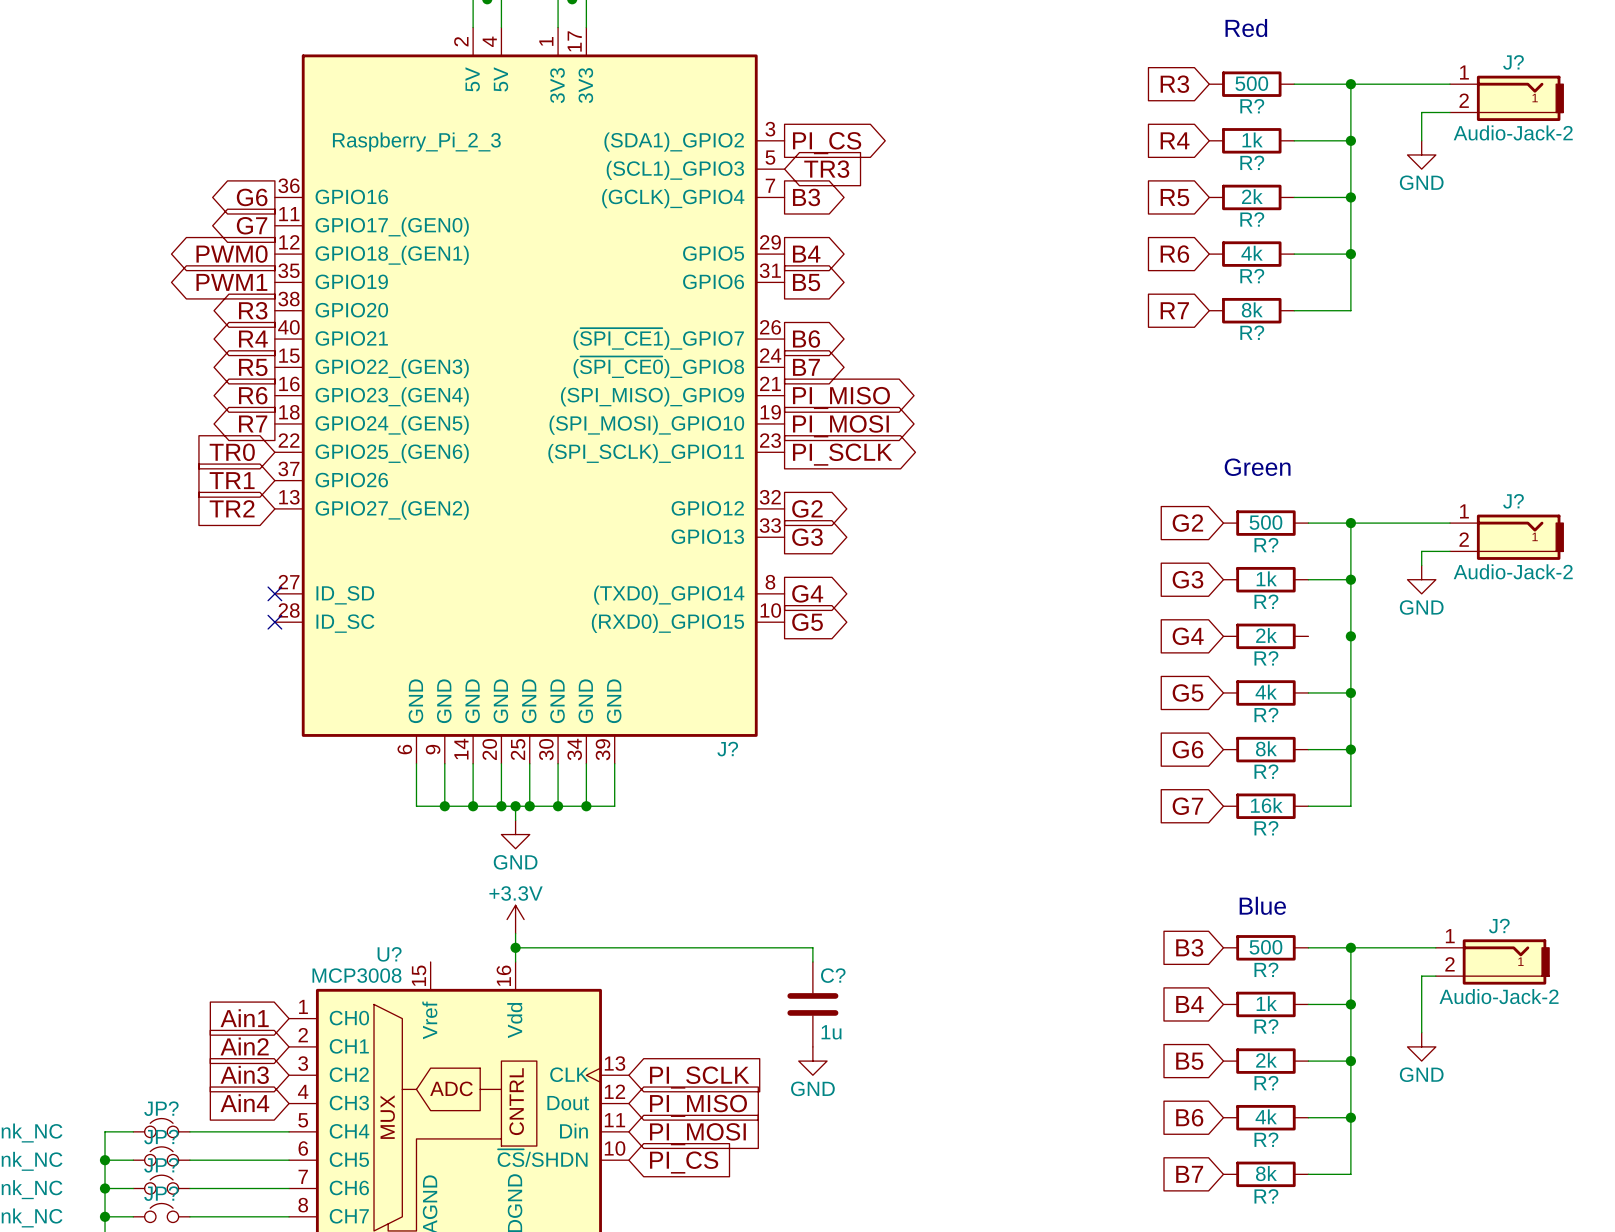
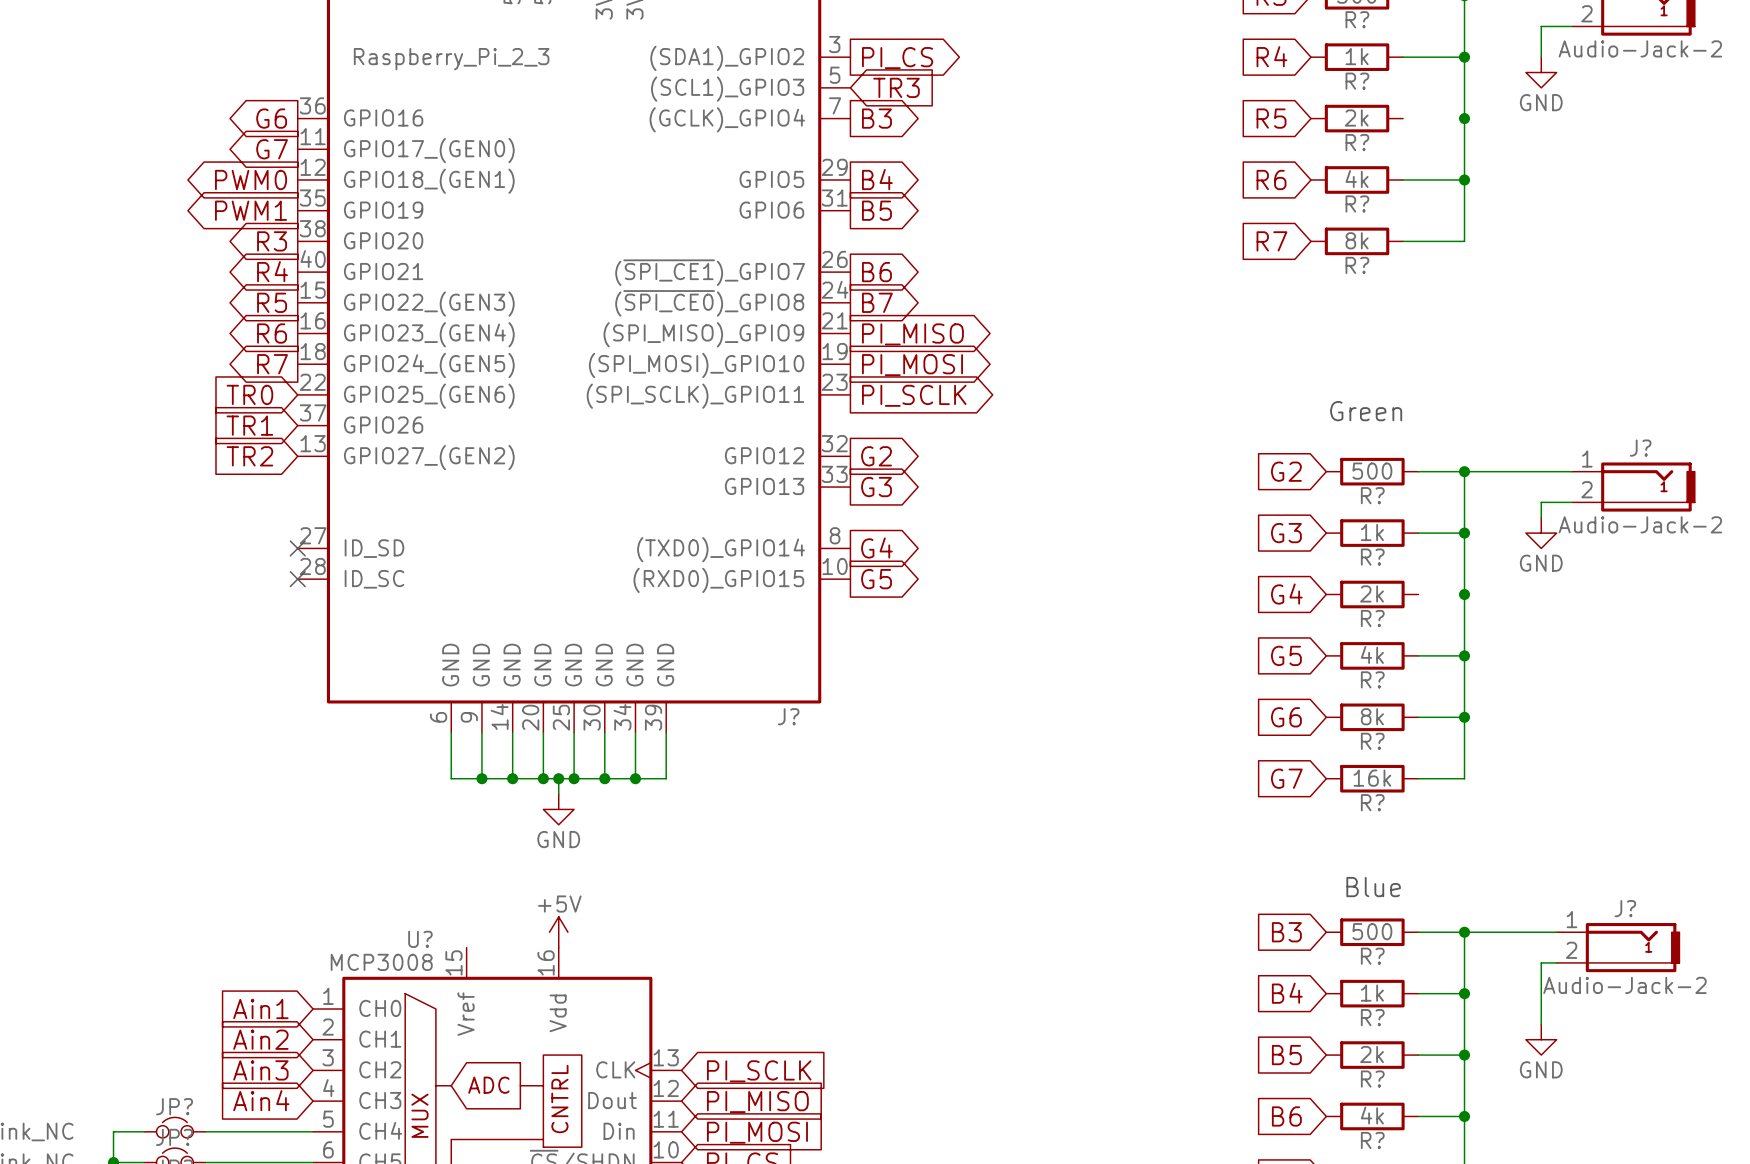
wire: (1294, 197) (1350, 197) -> none
power symbol: +3.3V (515, 919) -> none
wire: (515, 947) (812, 947) (812, 961) -> none
power symbol: none -> +5V (558, 932)
junction: (515, 947) -> none
C?: 1u (812, 1004) -> none
power symbol: GND (812, 1061) -> none

